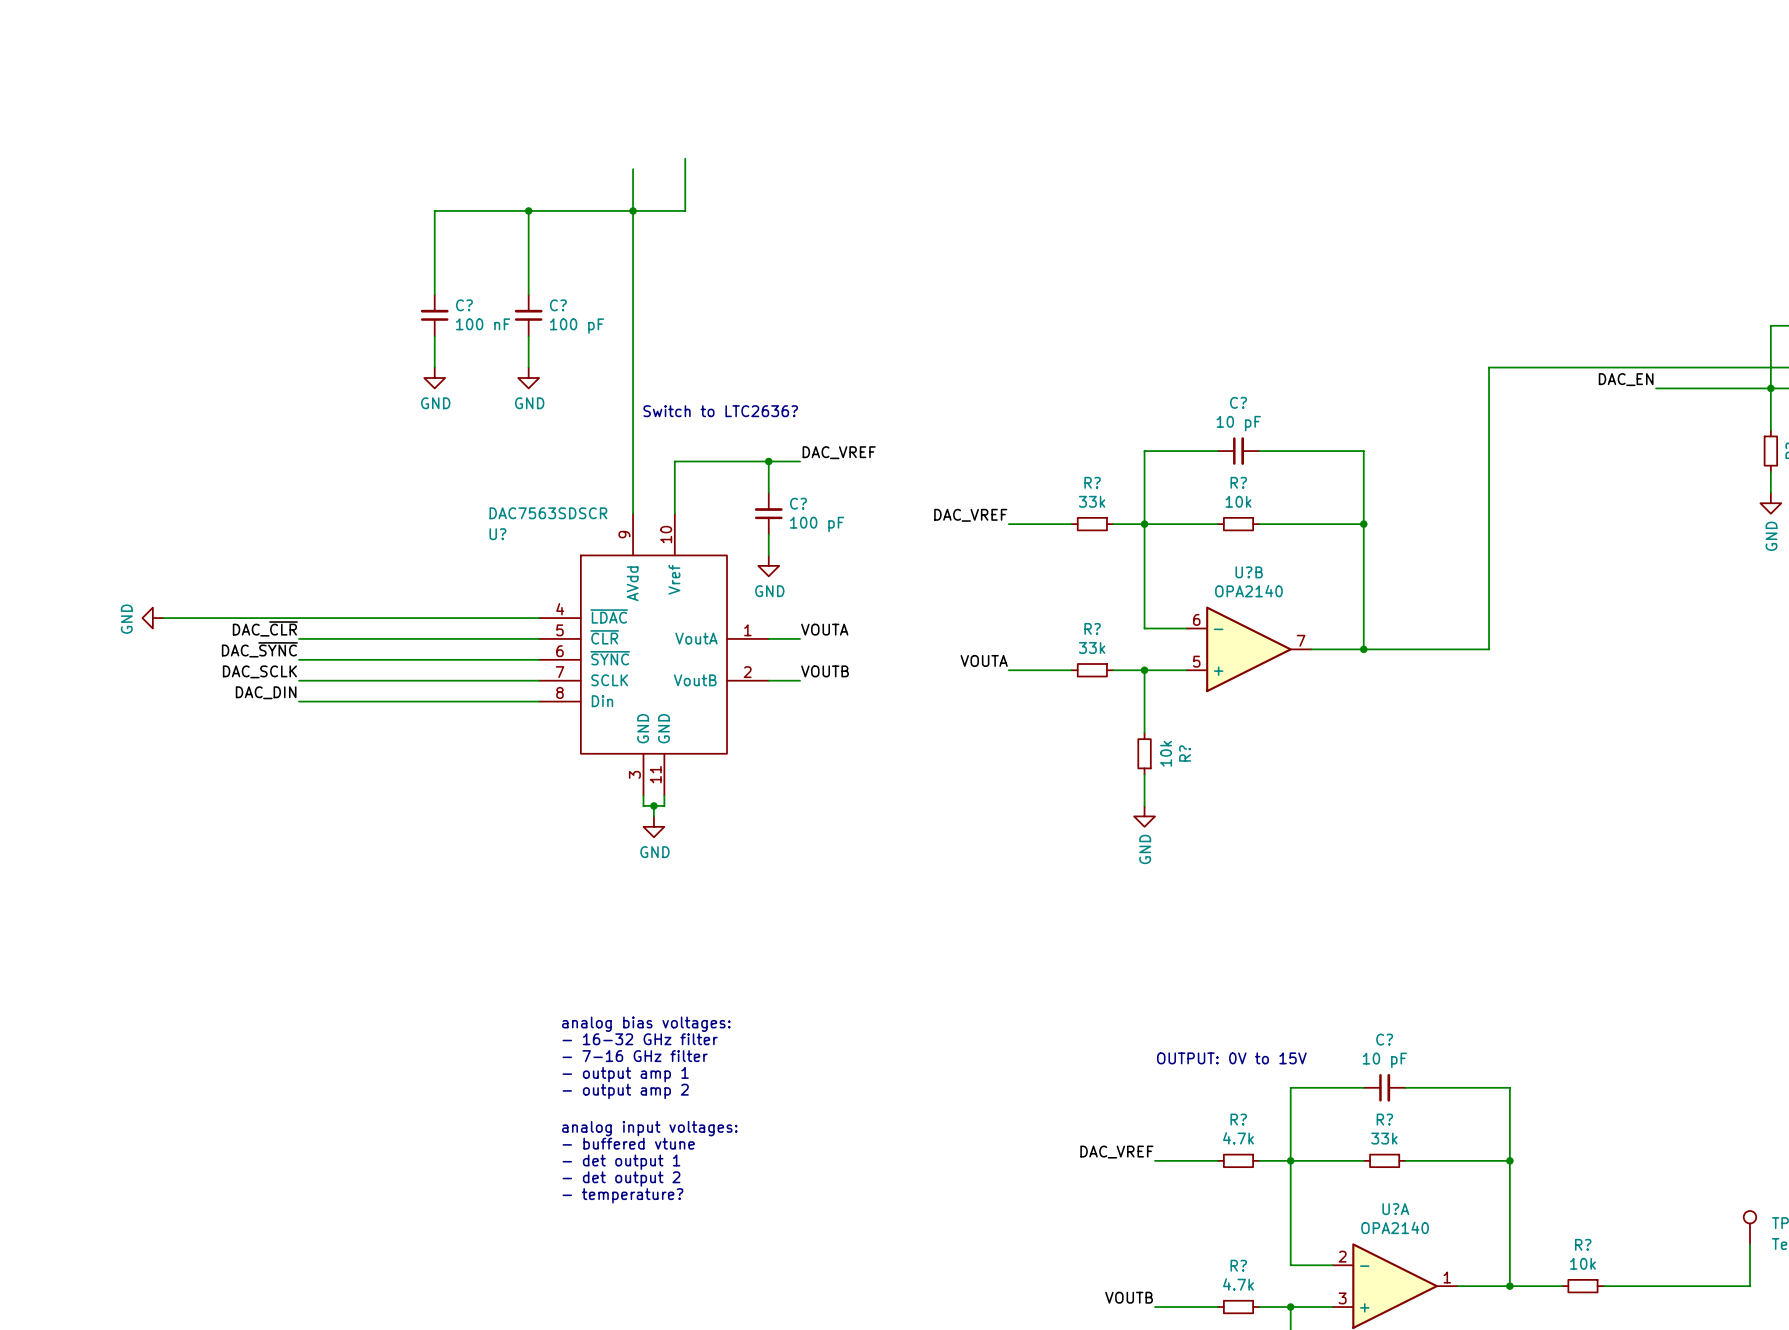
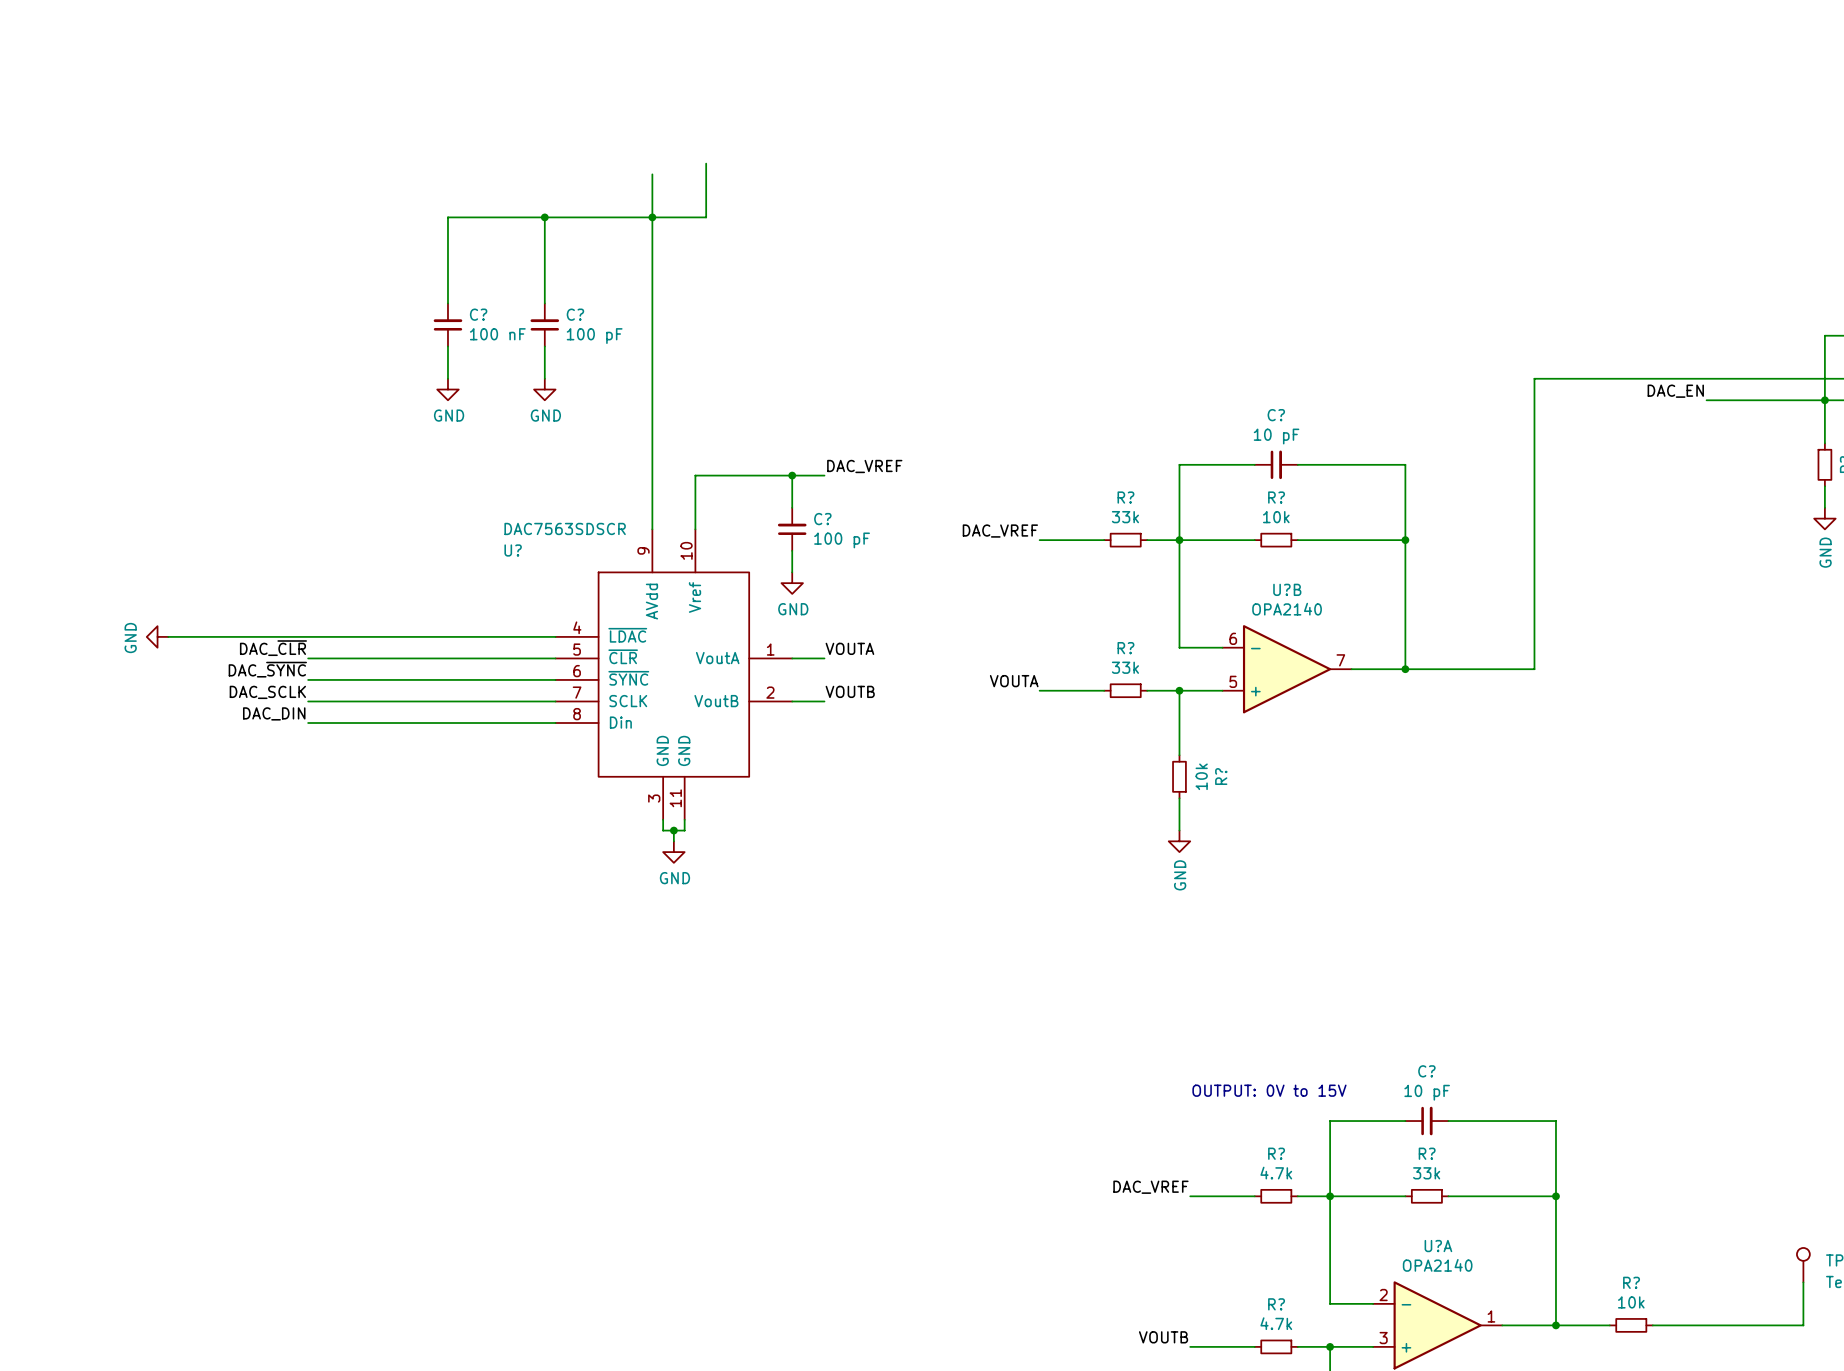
text: Switch to LTC2636? (720, 411) -> none
text: analog bias voltages: (646, 1024) -> none
text: - 16-32 GHz filter (640, 1039) -> none
text: - 7-16 GHz filter (635, 1056) -> none
text: - output amp 1 (625, 1074) -> none
text: - output amp 2 (625, 1091) -> none
text: analog input voltages: (649, 1128) -> none
text: - buffered vtune (628, 1143) -> none
text: - det output 1 (621, 1162) -> none
text: - det output 2 (621, 1179) -> none
text: - temperature? (622, 1195) -> none

